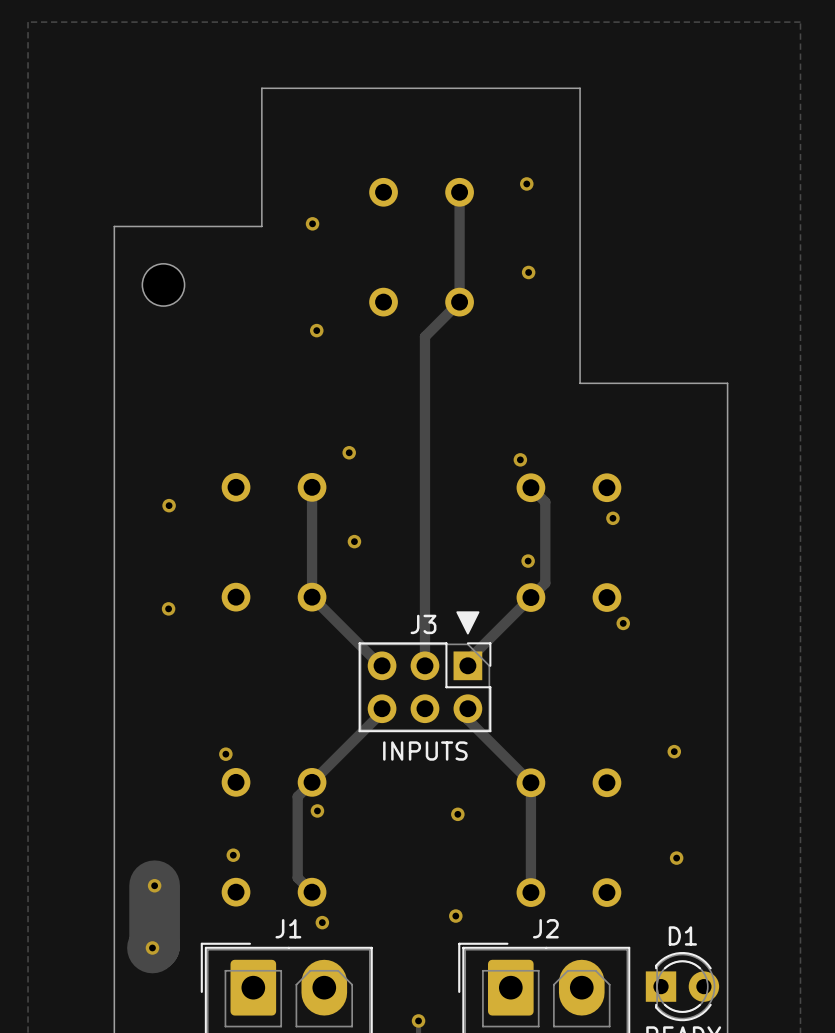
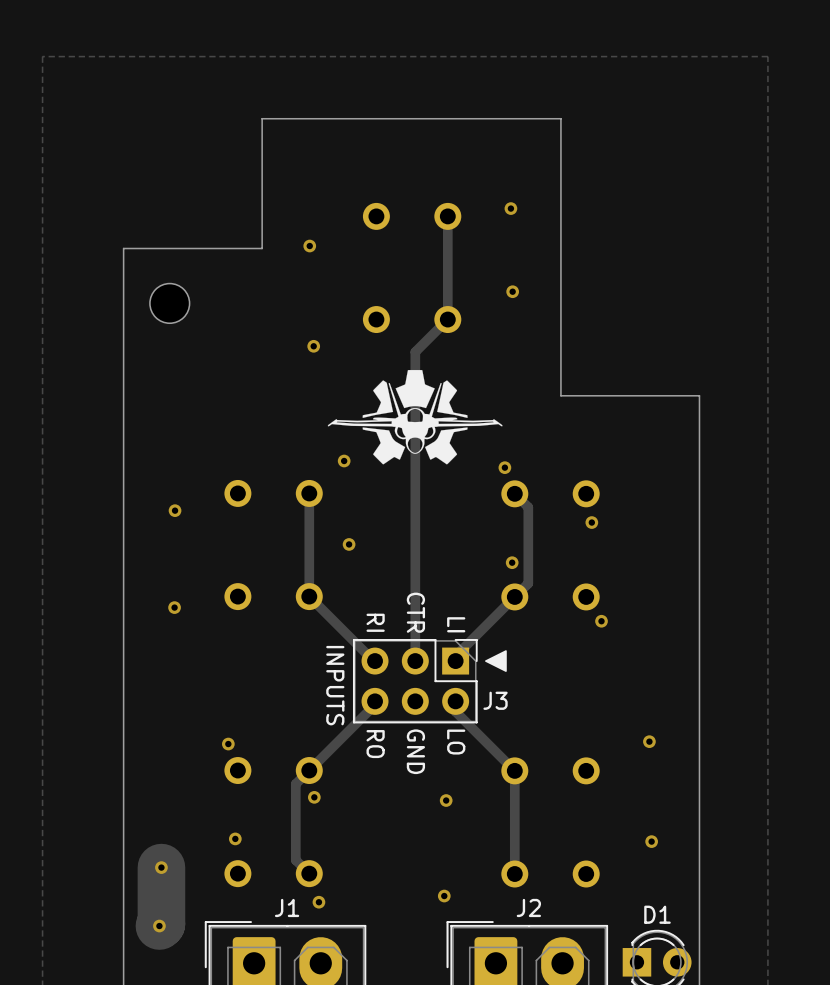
drawing: none -> [327, 369, 503, 465]
drawing: [456, 611, 480, 635] -> none
text: none -> CTR (415, 612)
J3 name position: J3 (423, 624) -> J3 (495, 700)
text: none -> RI (375, 622)
text: none -> LI (456, 624)
drawing: none -> [485, 650, 507, 672]
J3 value rotation: 0° (425, 751) -> 90° clockwise (335, 685)
text: none -> LO (456, 742)
text: none -> RO (375, 744)
text: none -> GND (415, 751)

